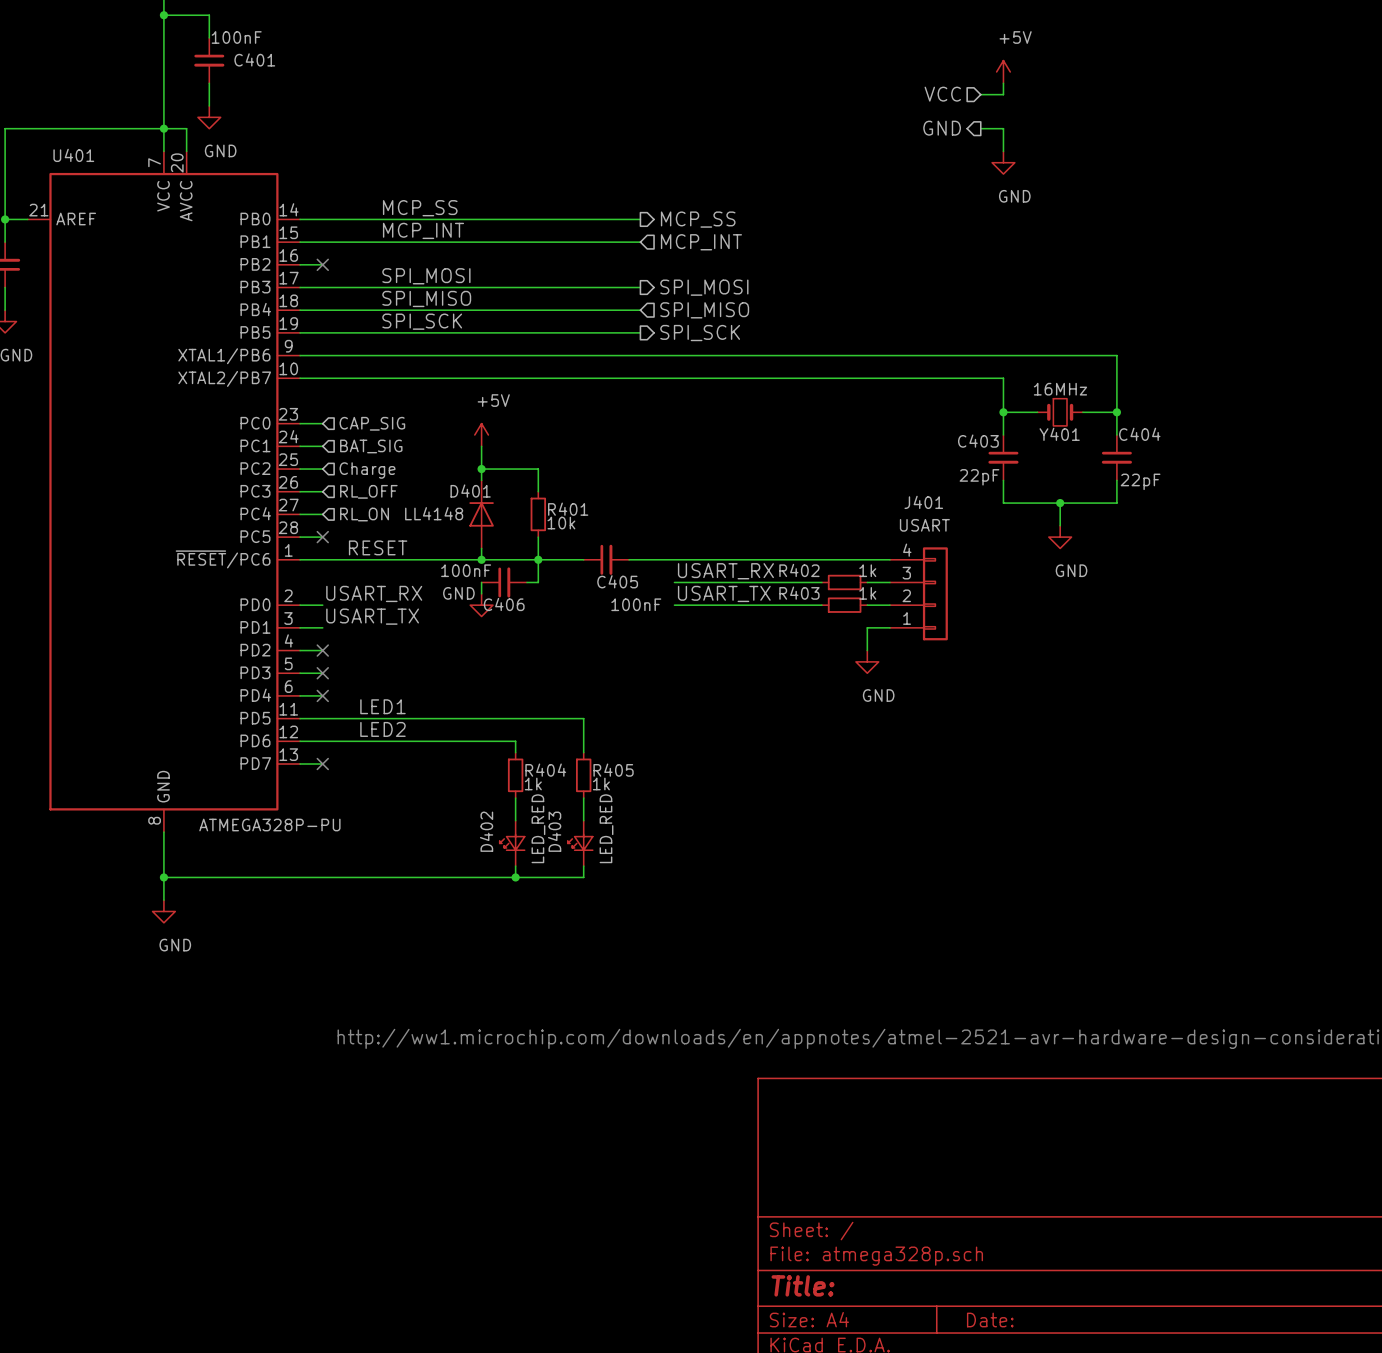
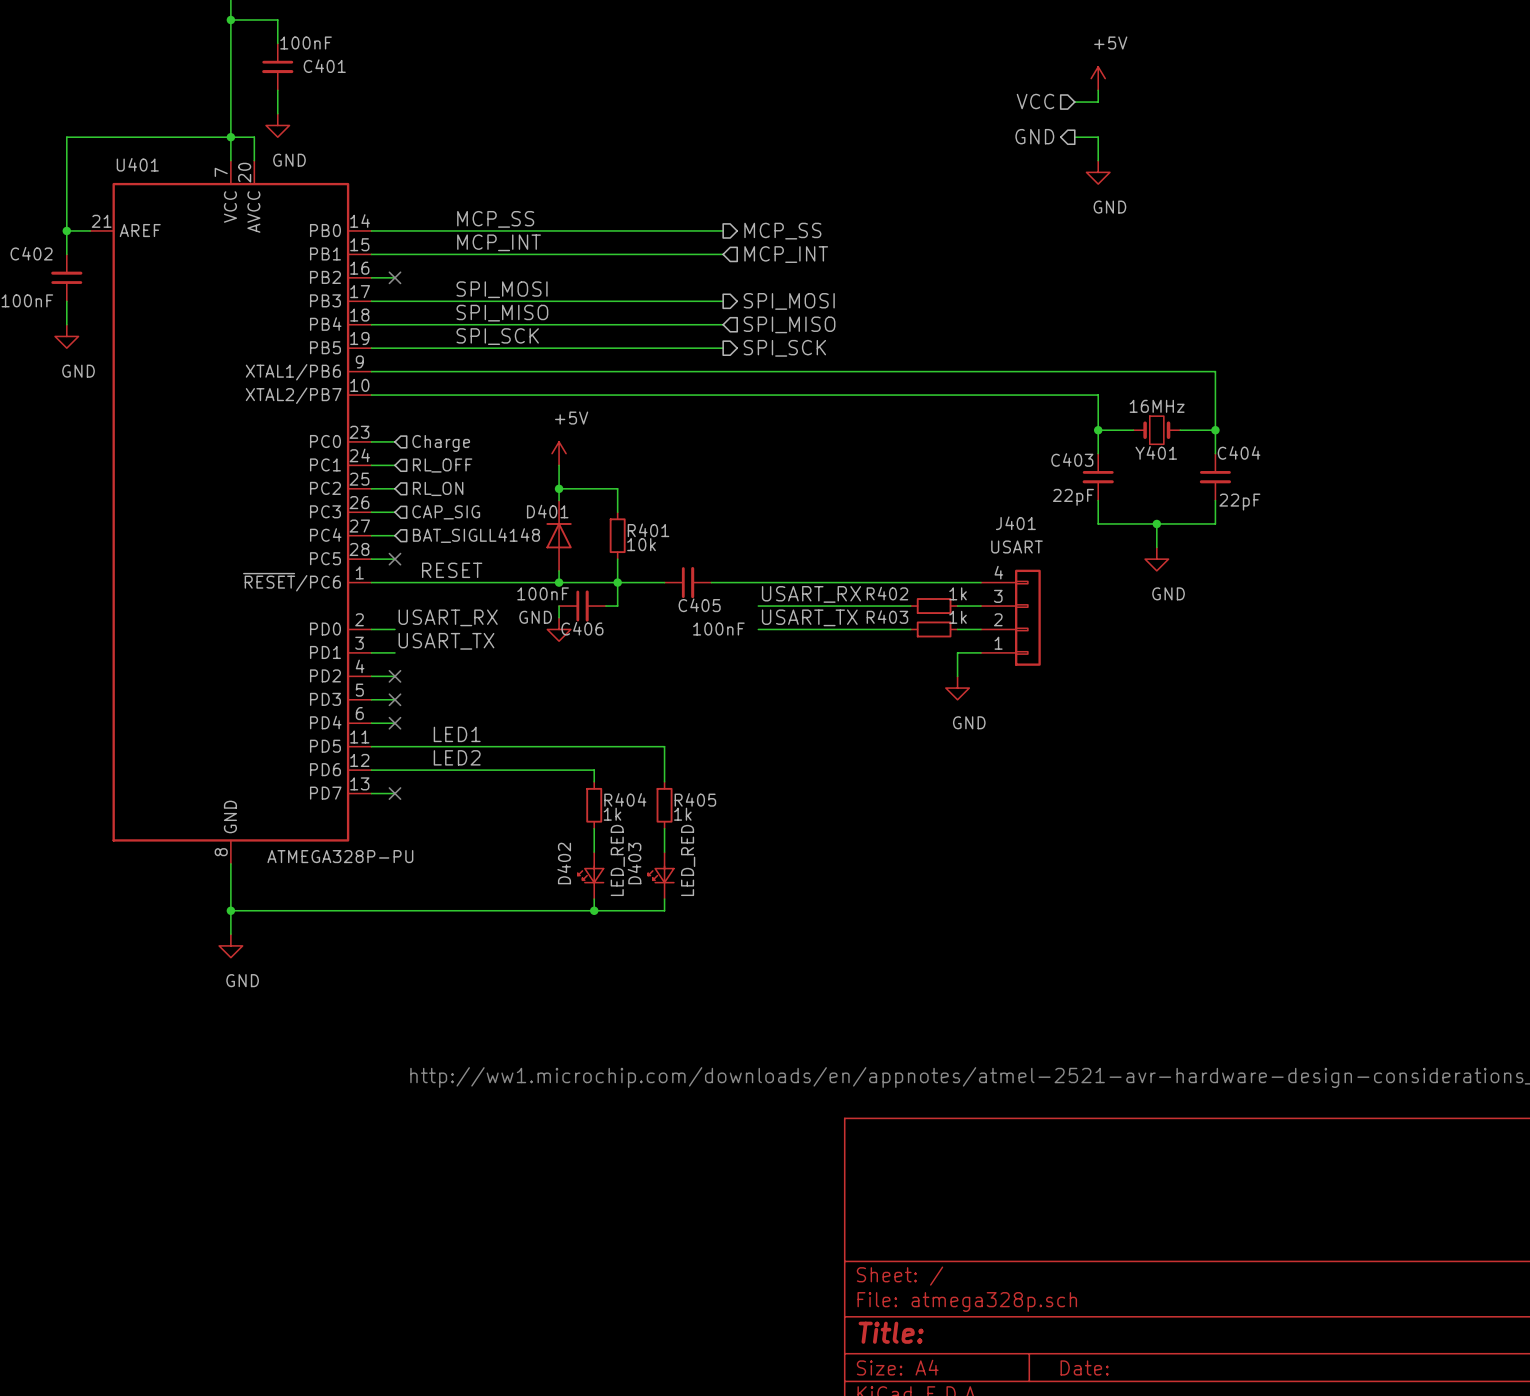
hierarchical label: CAP_SIG (372, 423) -> Charge (441, 443)
hierarchical label: BAT_SIG (371, 446) -> RL_OFF (442, 465)
hierarchical label: Charge (367, 470) -> RL_ON (438, 488)
hierarchical label: RL_OFF (368, 491) -> CAP_SIG (446, 512)
hierarchical label: RL_ON (364, 514) -> BAT_SIG (445, 535)

